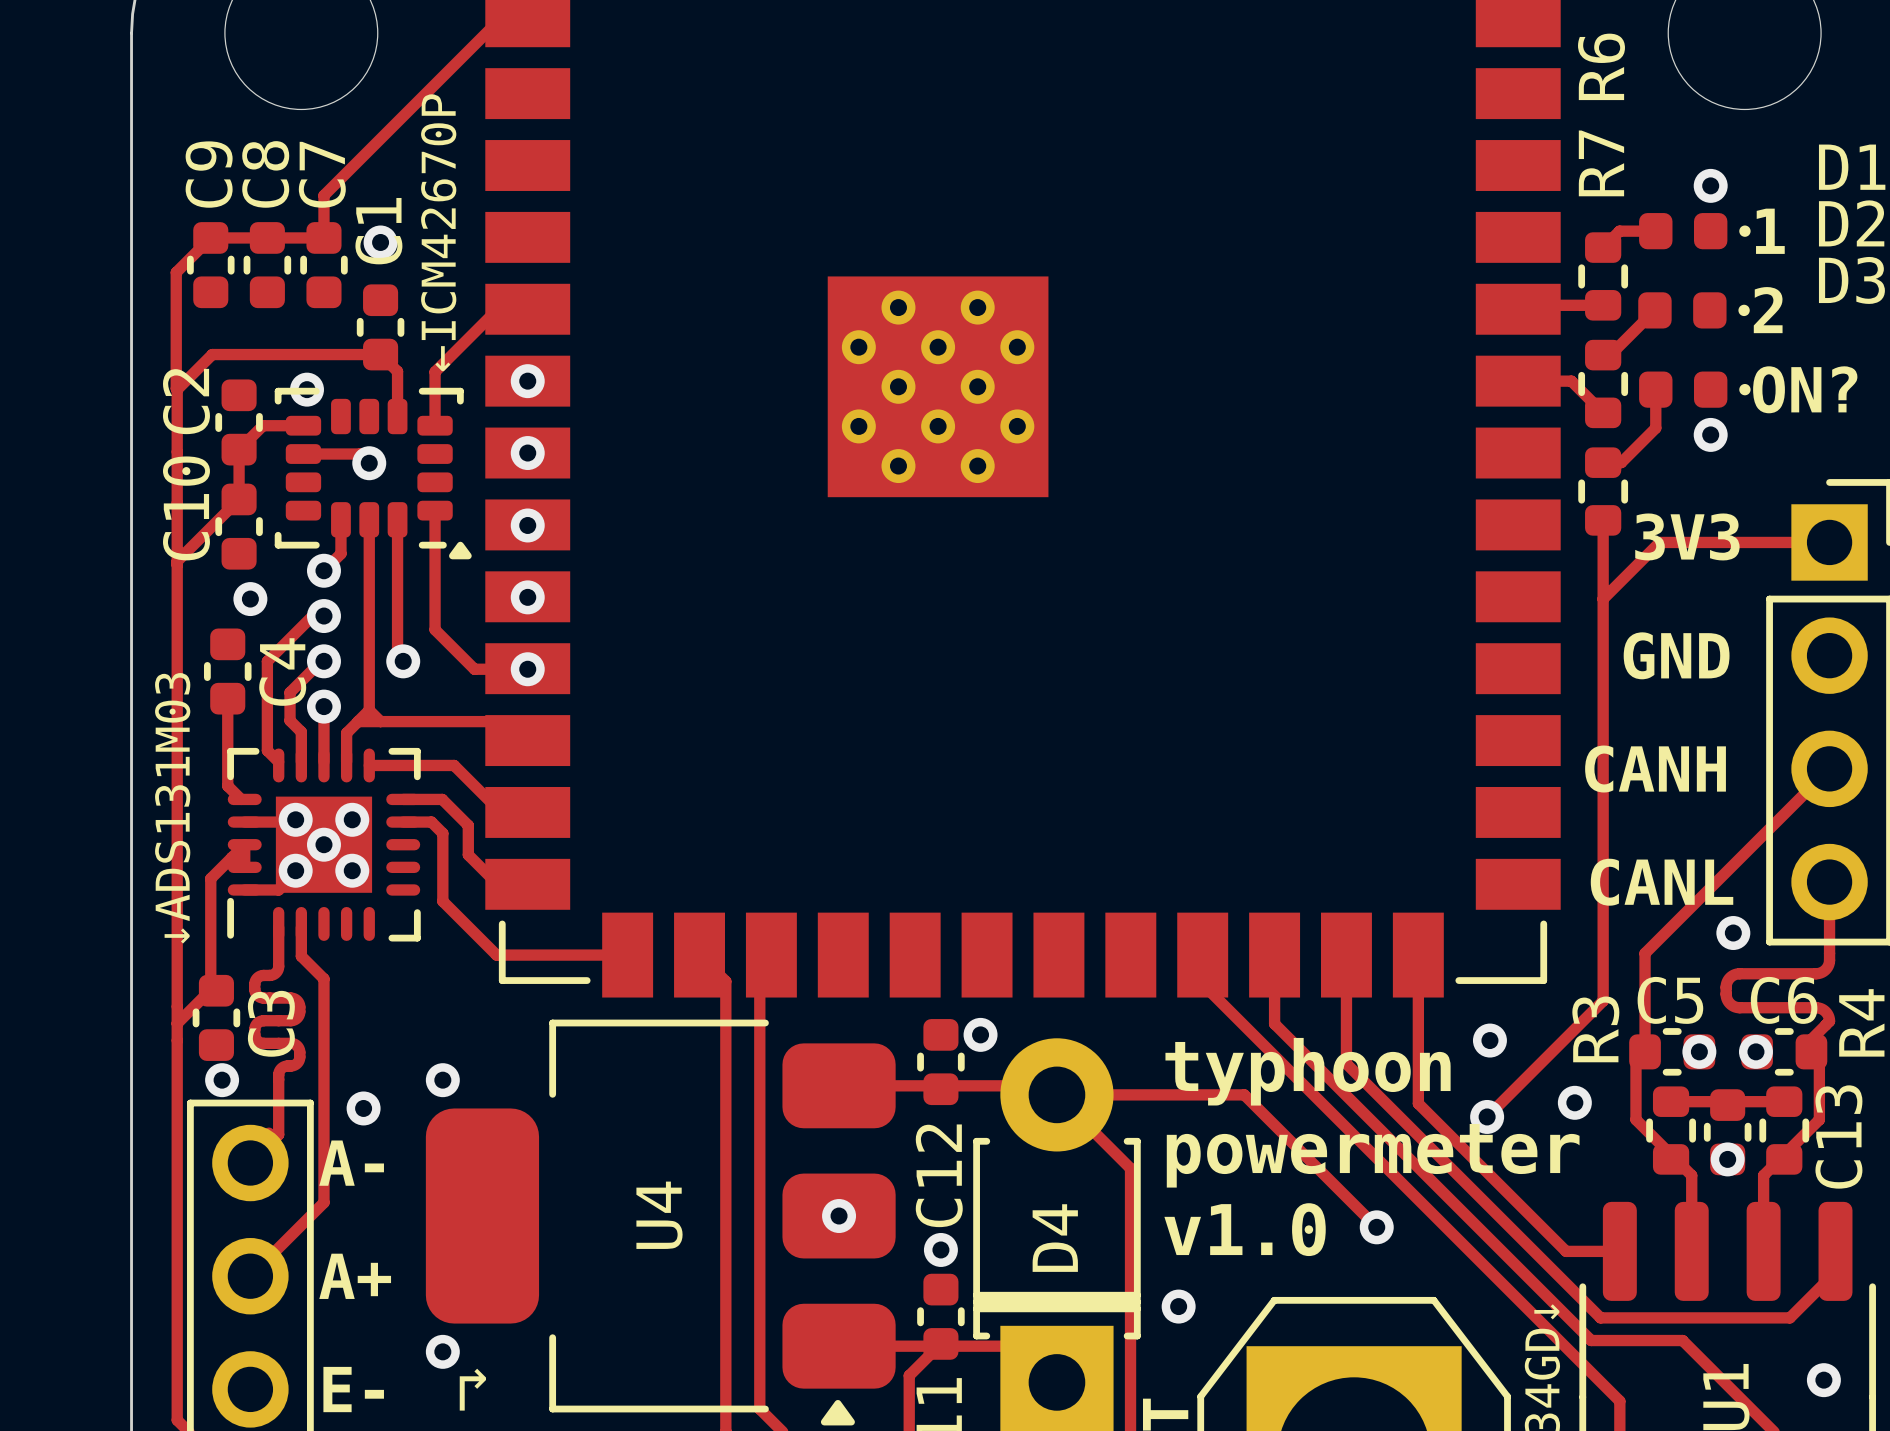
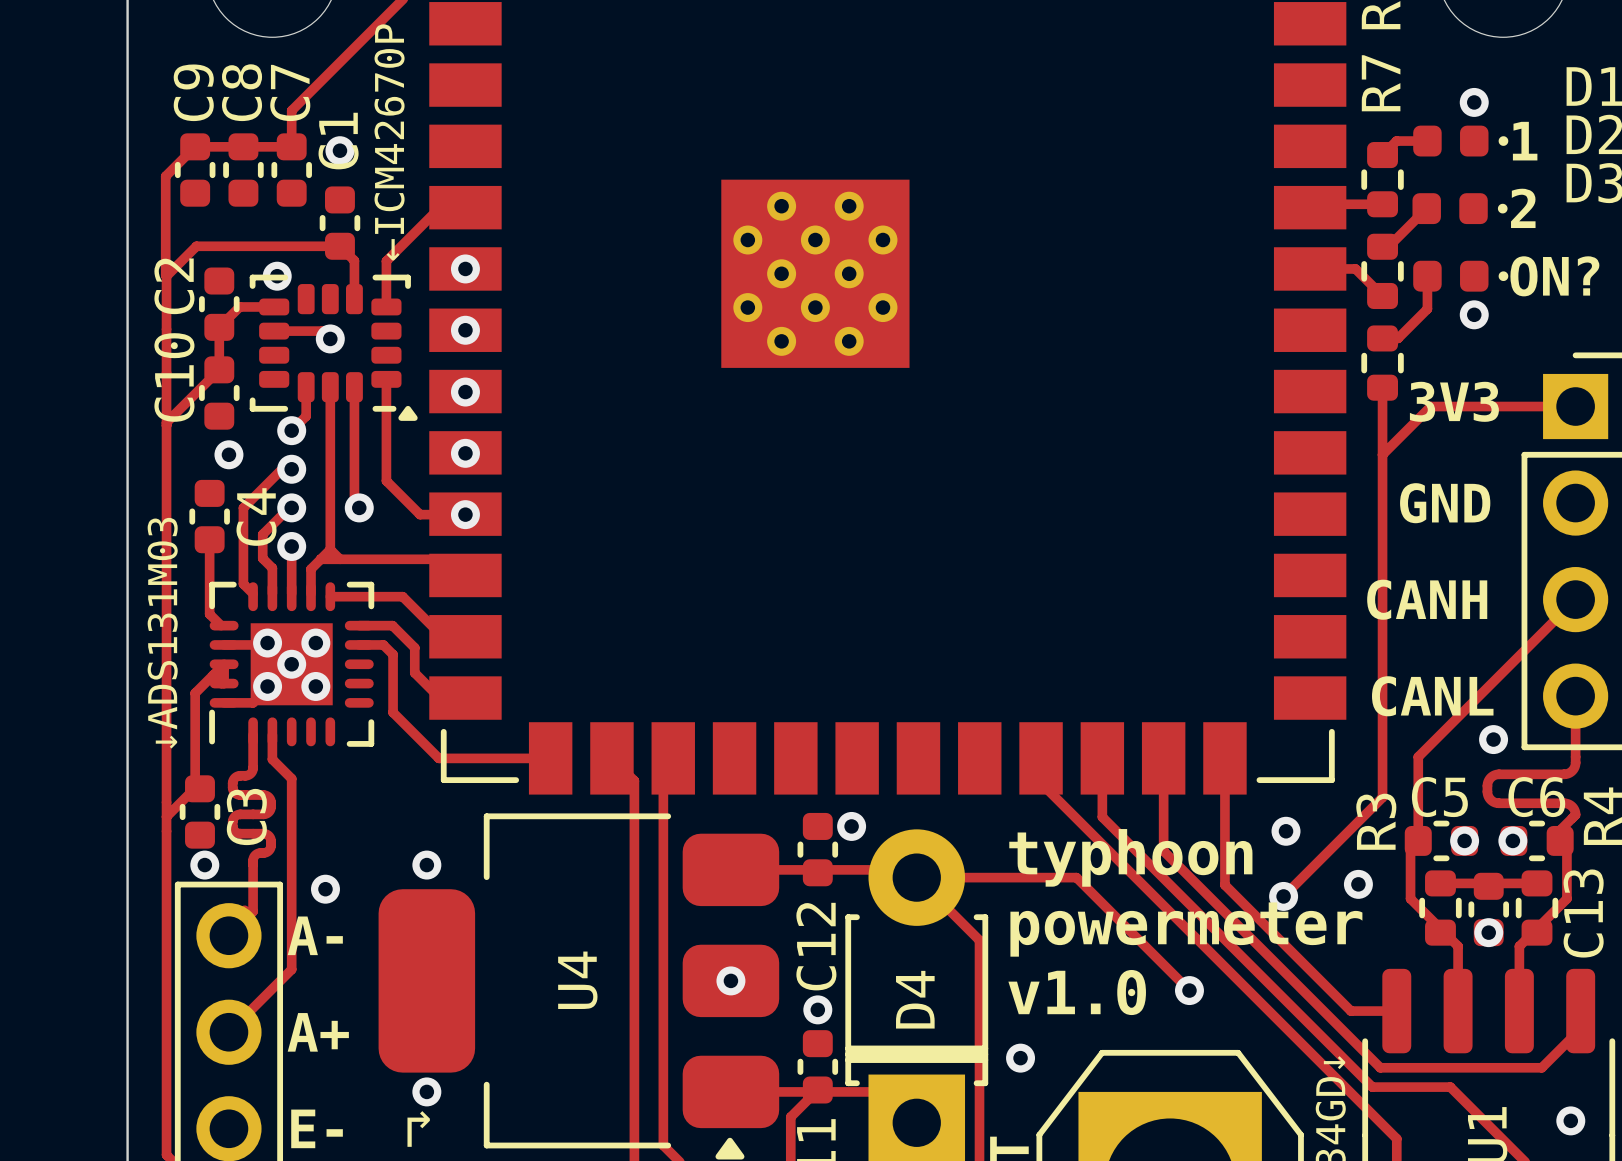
via position: (442, 1080) -> (426, 865)
via position: (442, 1351) -> (426, 1091)

